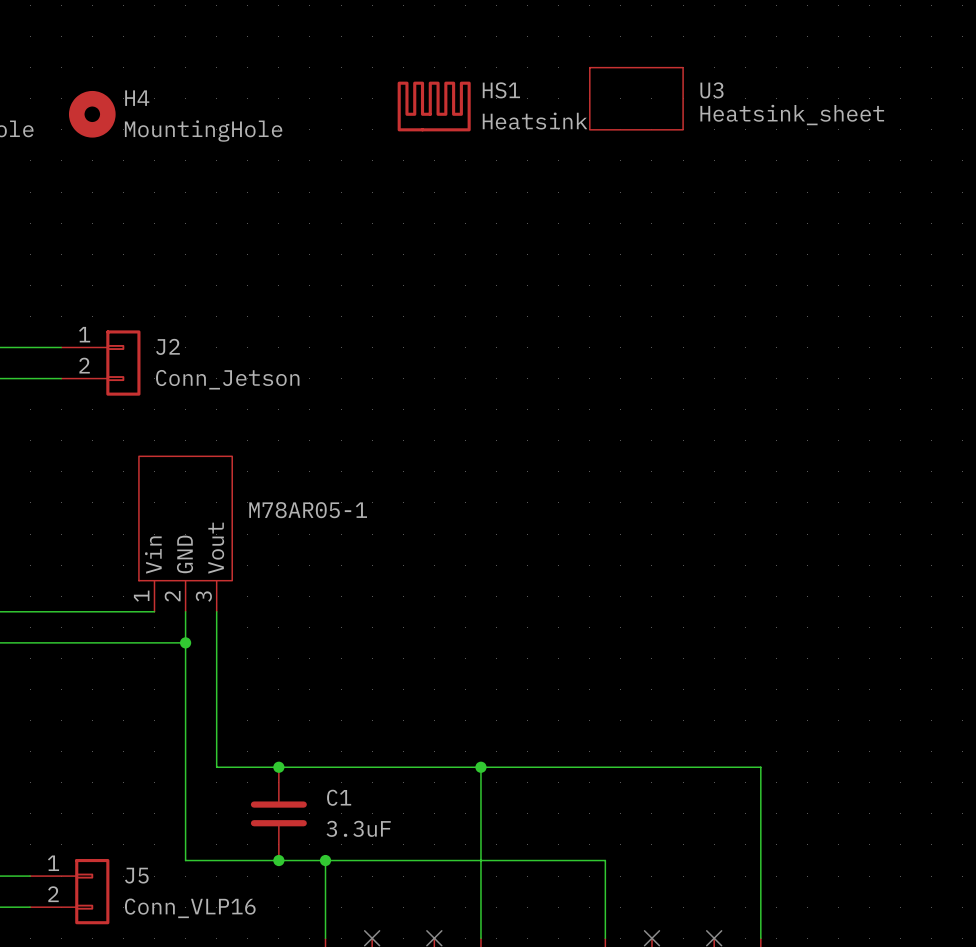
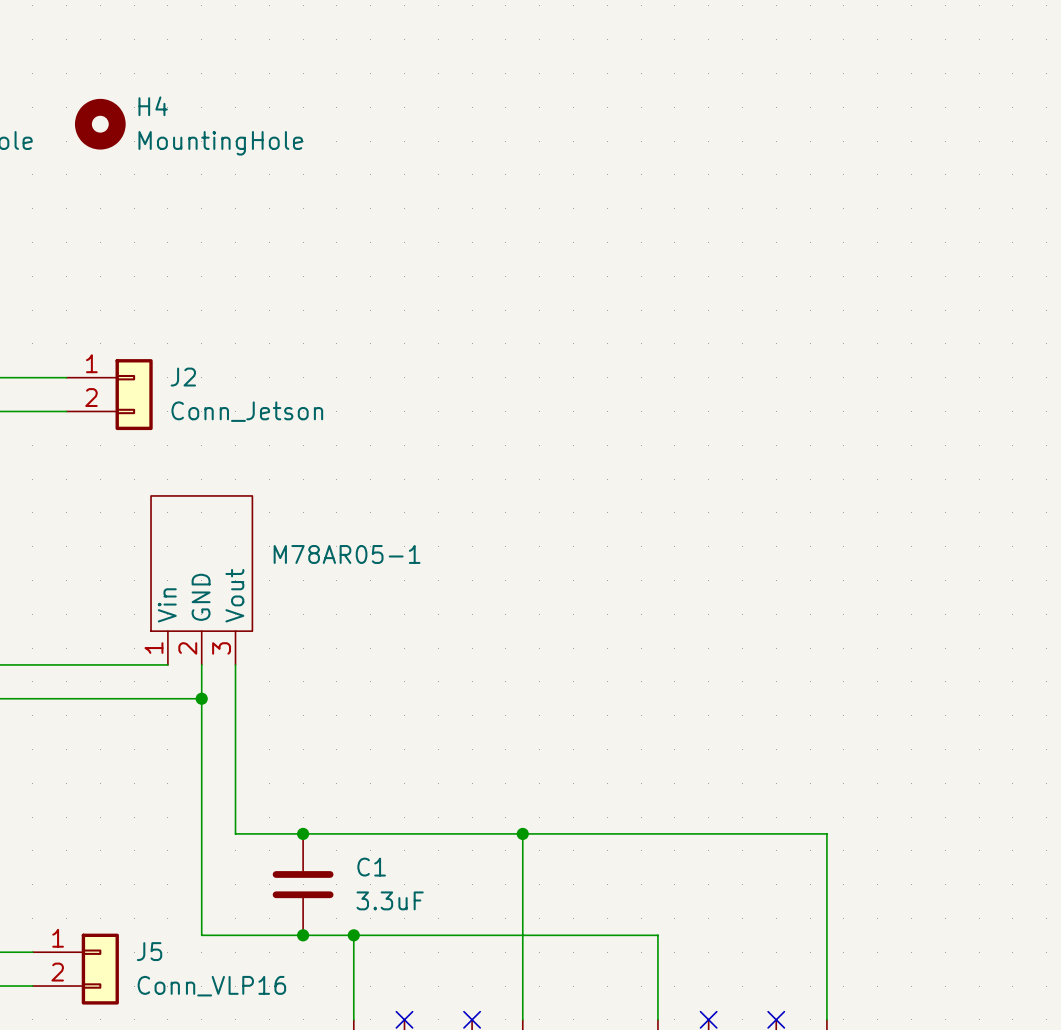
U3: Heatsink_sheet (636, 98) -> none
HS1: Heatsink (434, 106) -> none

